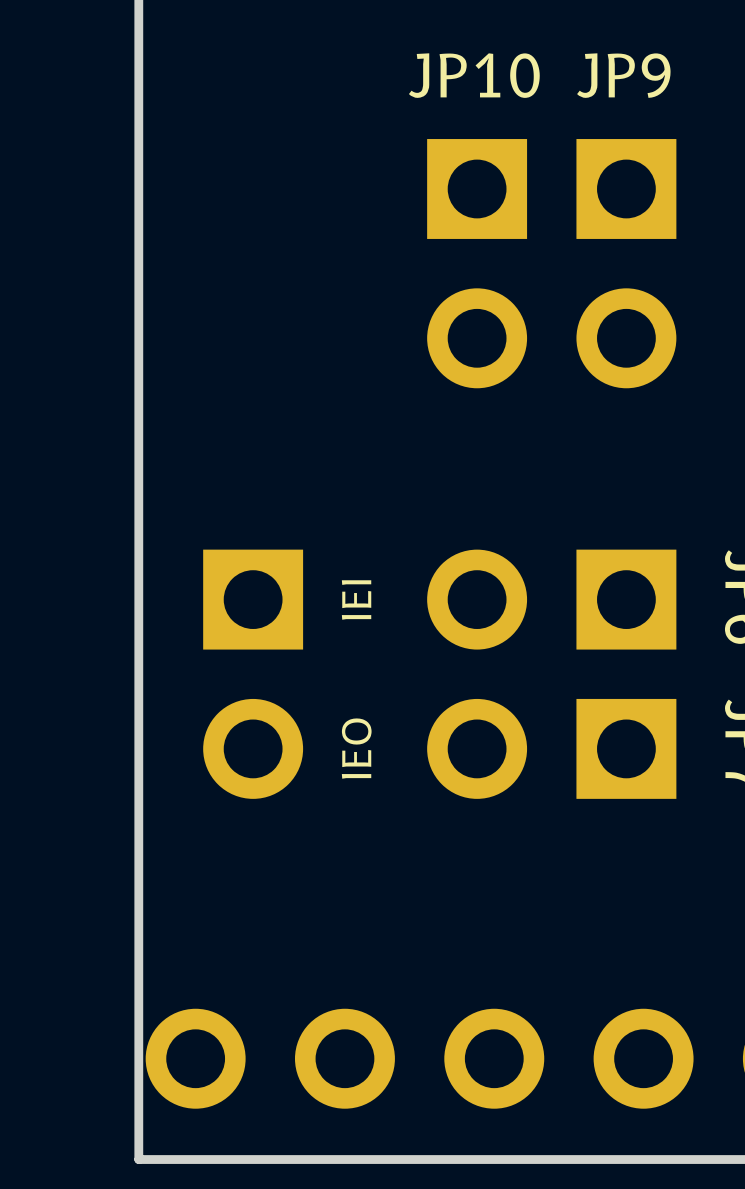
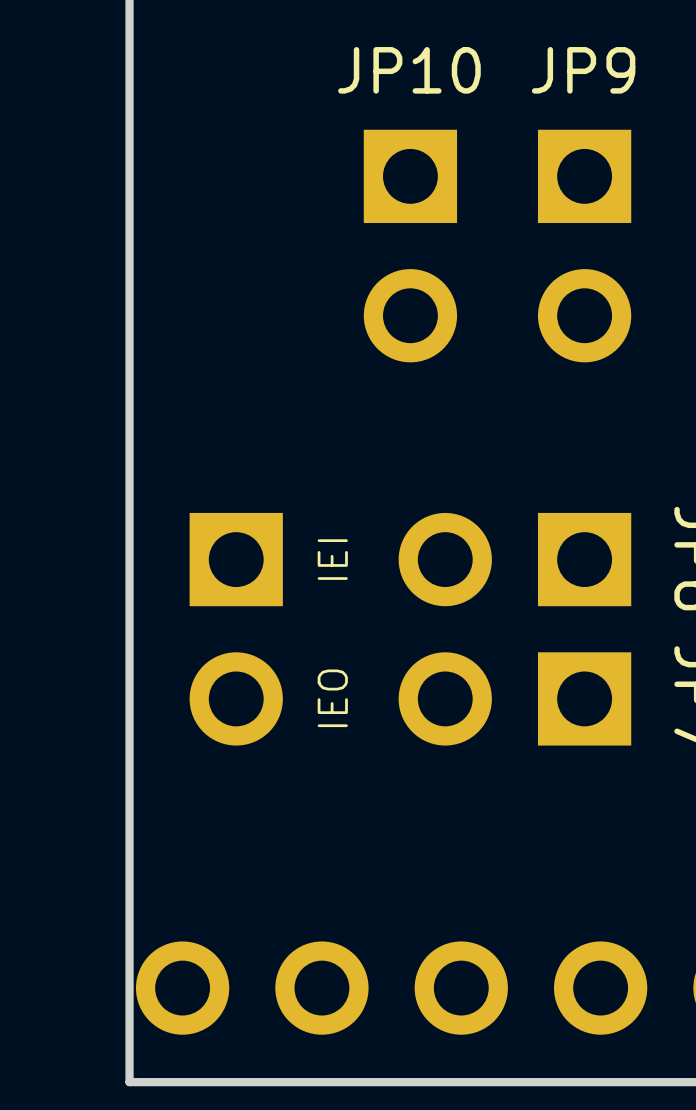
text position: JP10 (474, 75) -> JP10 (409, 70)
part position: (477, 263) -> (410, 246)

